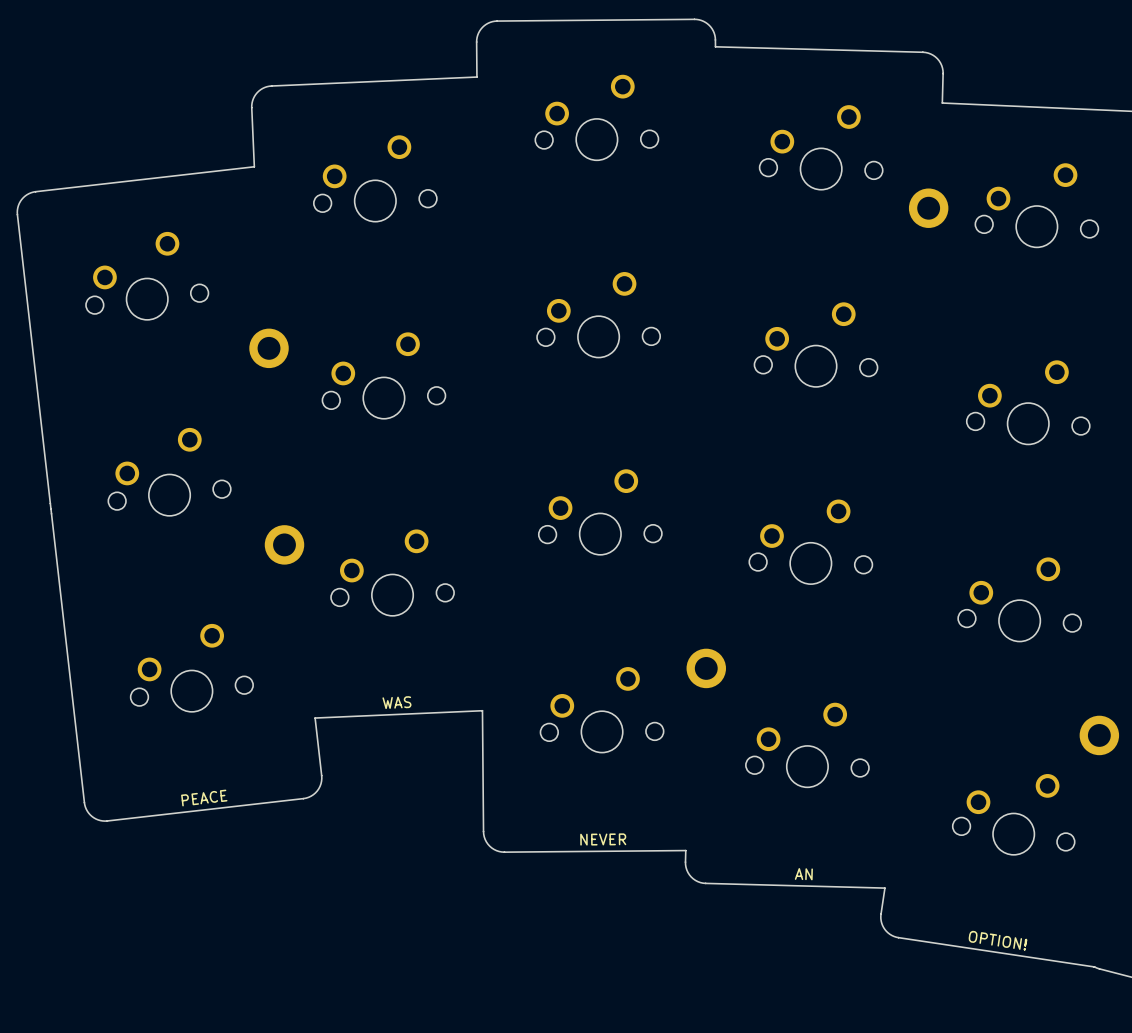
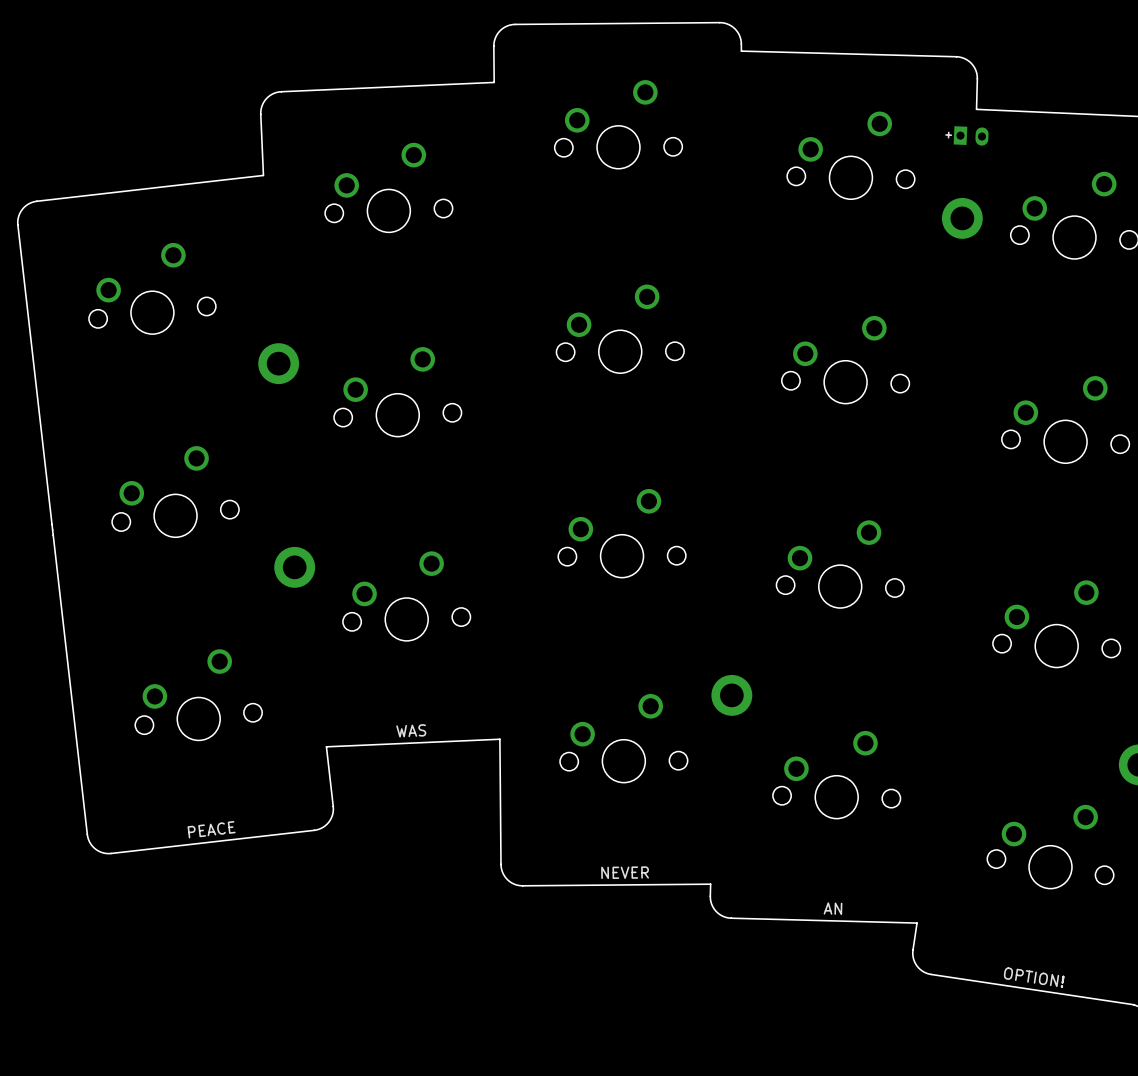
part: none -> (966, 135)

